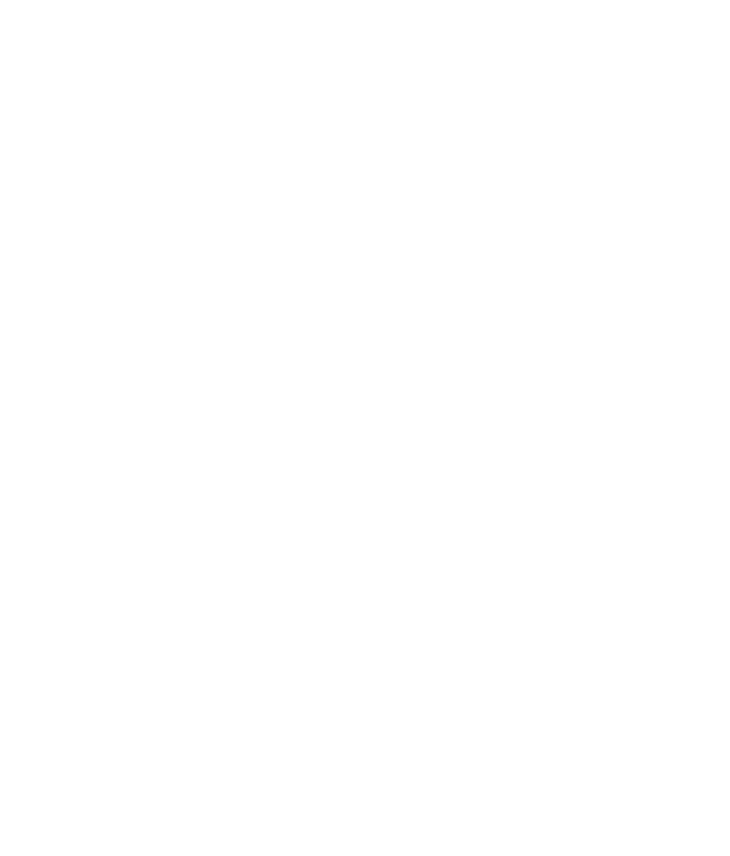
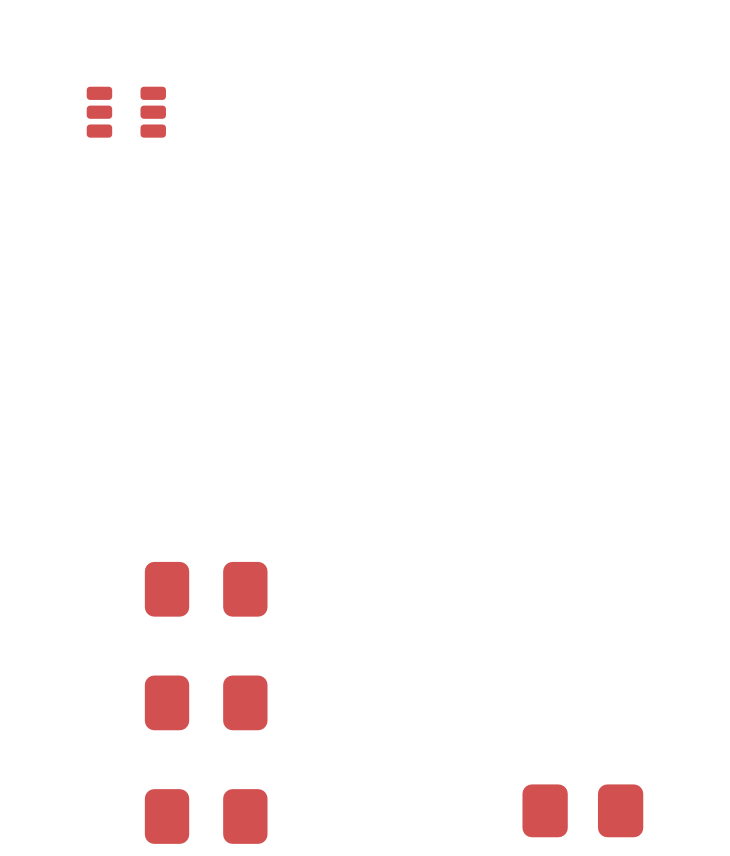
part: none -> (126, 112)
part: none -> (206, 589)
part: none -> (206, 702)
part: none -> (582, 810)
part: none -> (206, 816)

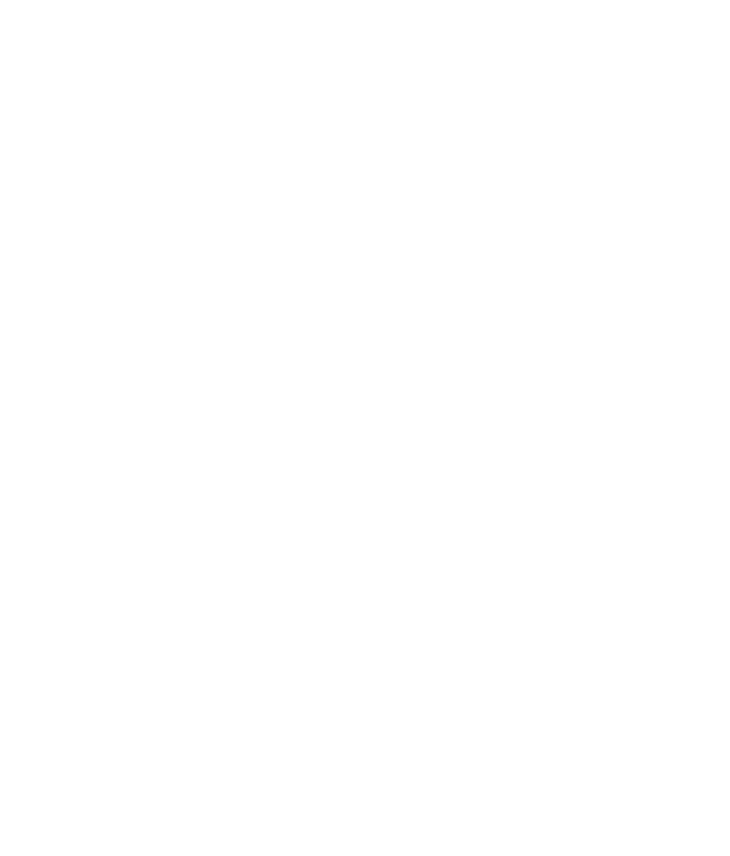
part: (126, 112) -> none
part: (206, 589) -> none
part: (206, 702) -> none
part: (582, 810) -> none
part: (206, 816) -> none

